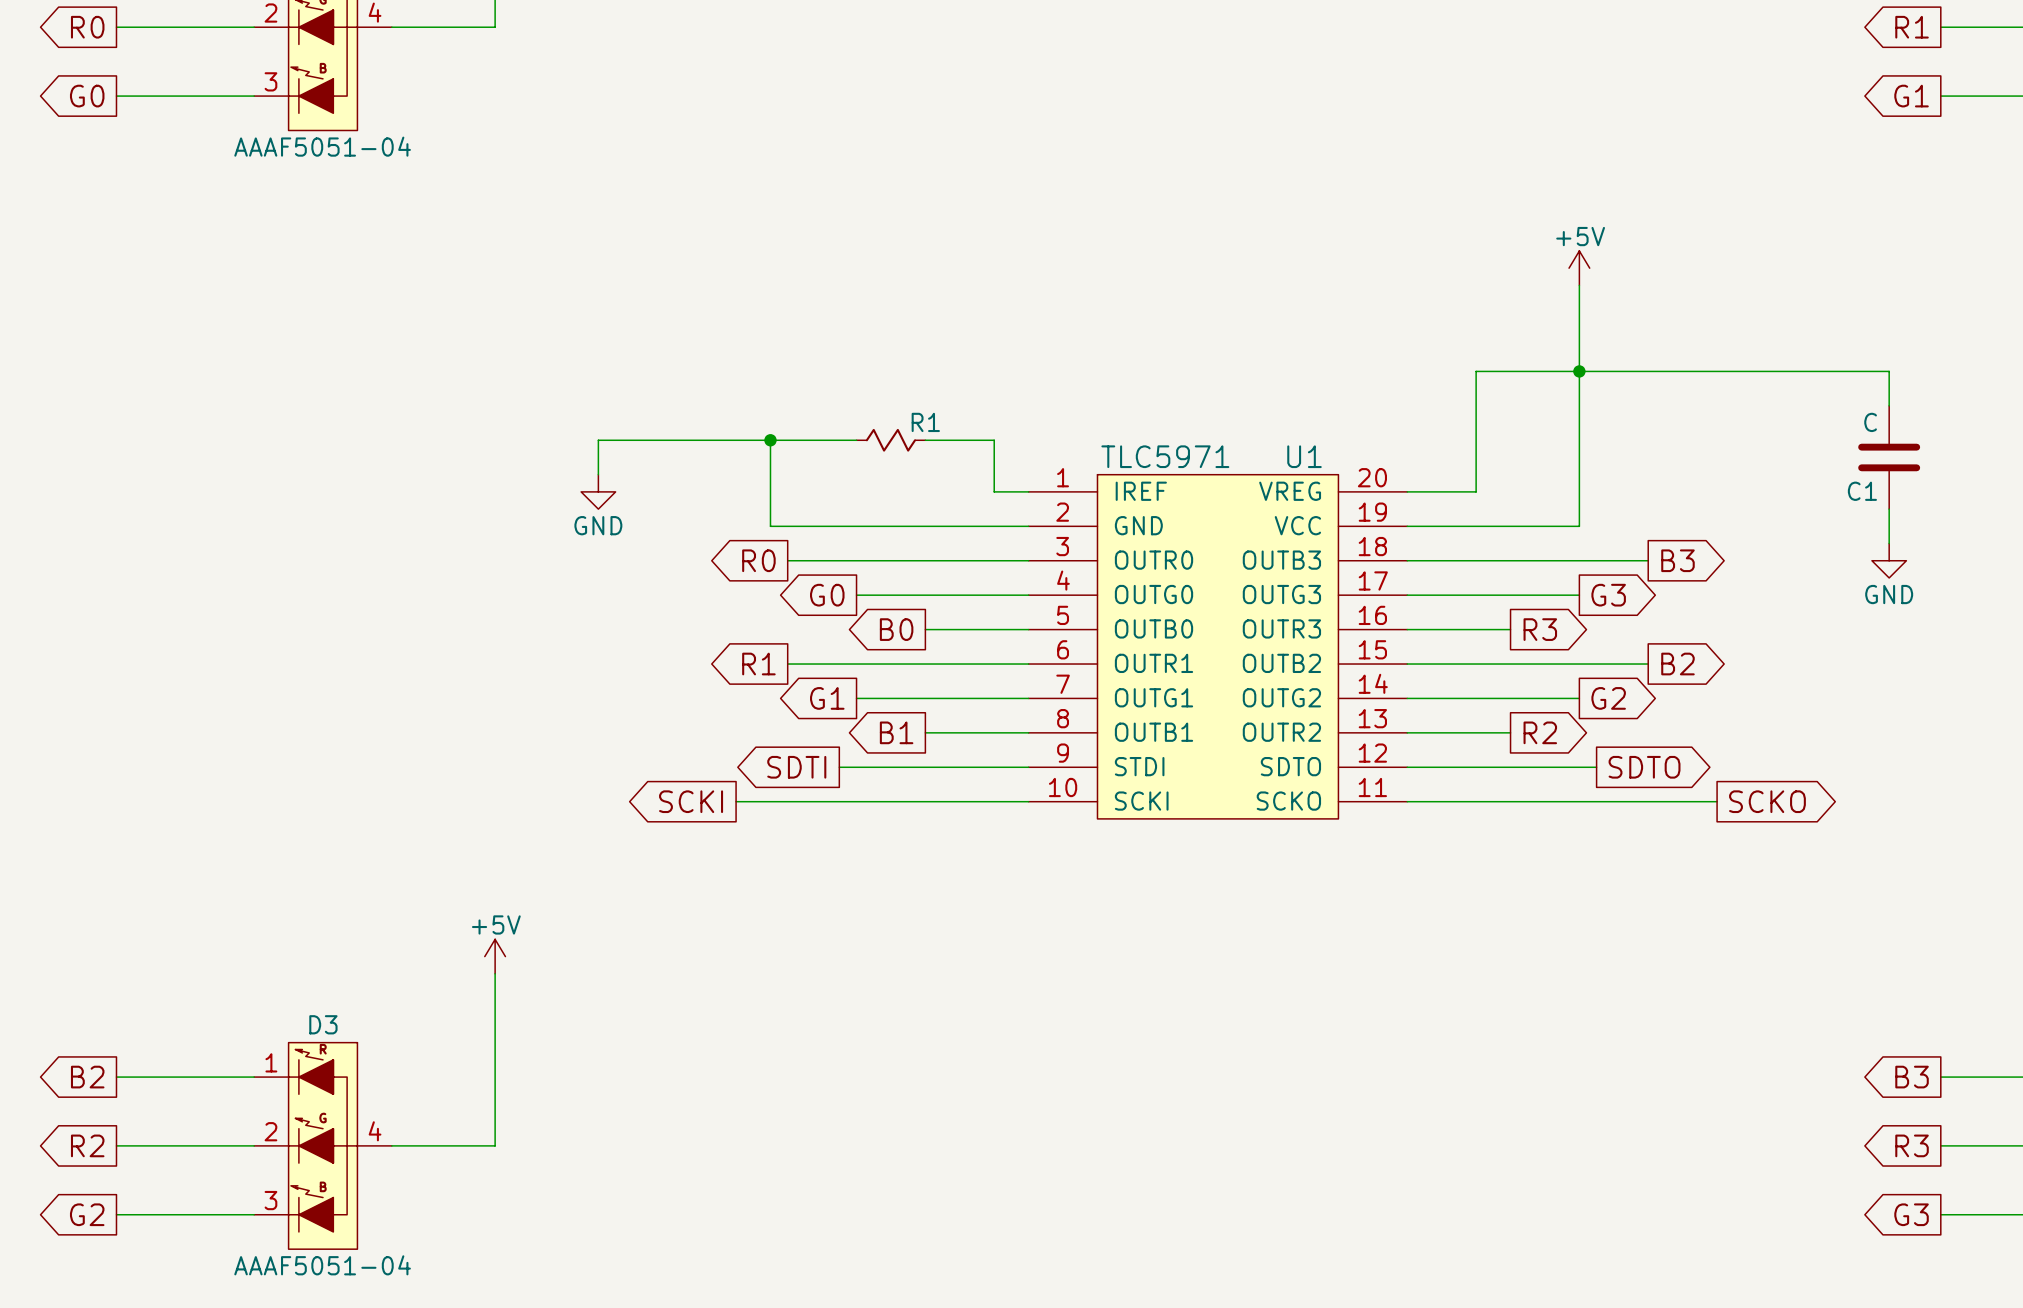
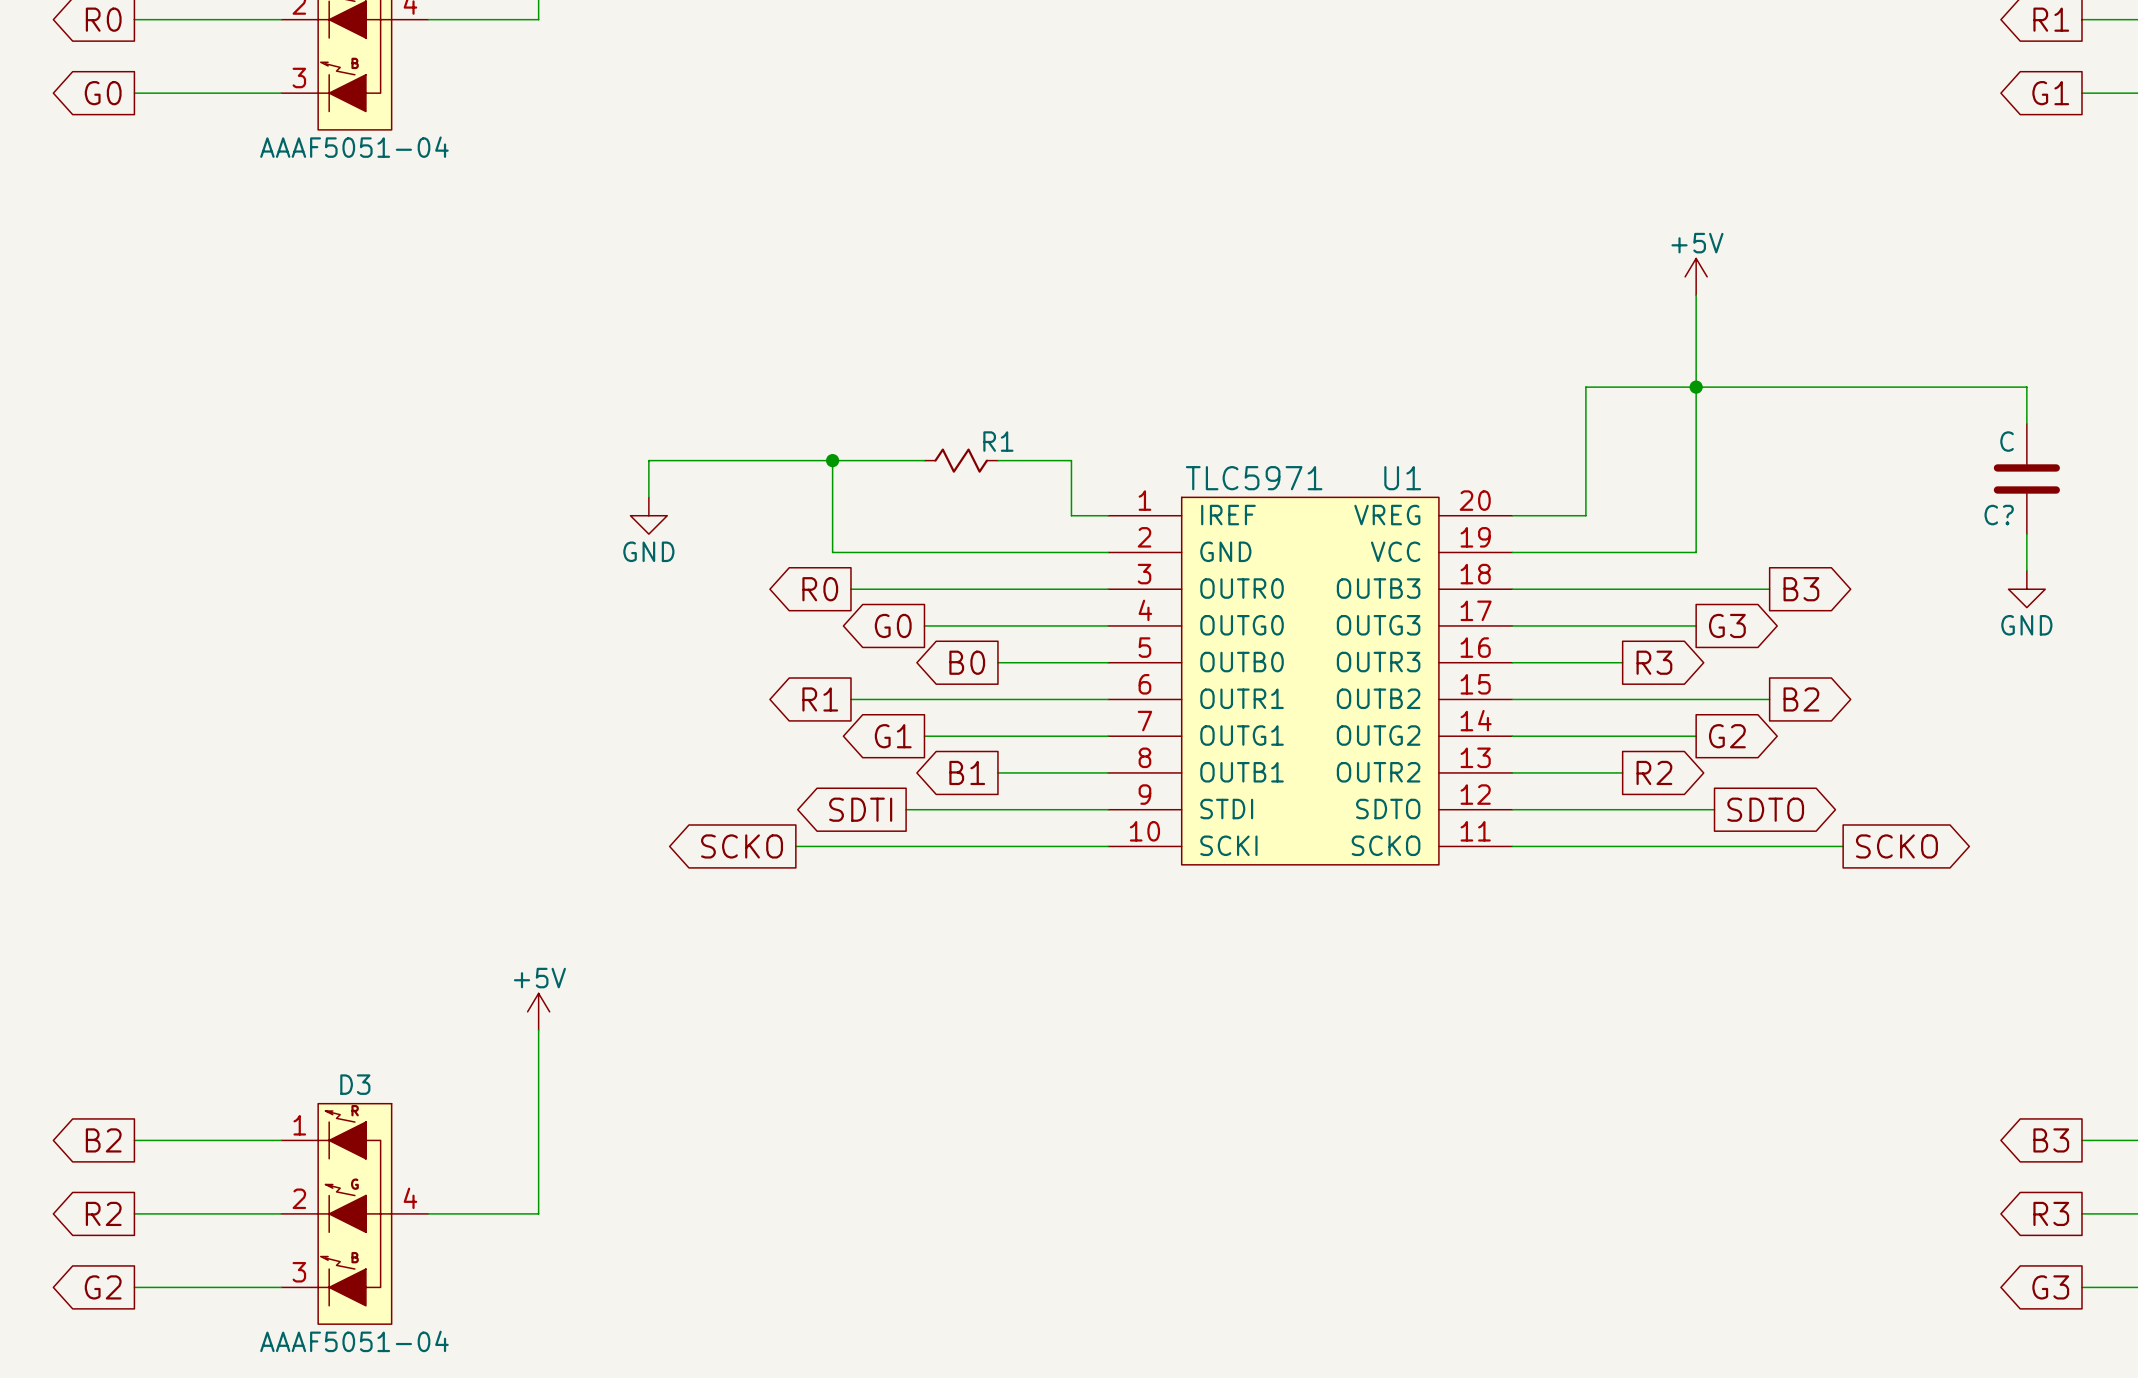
C1 name: C1 (1862, 491) -> C? (1999, 515)
global label: SCKI (691, 801) -> SCKO (742, 846)

